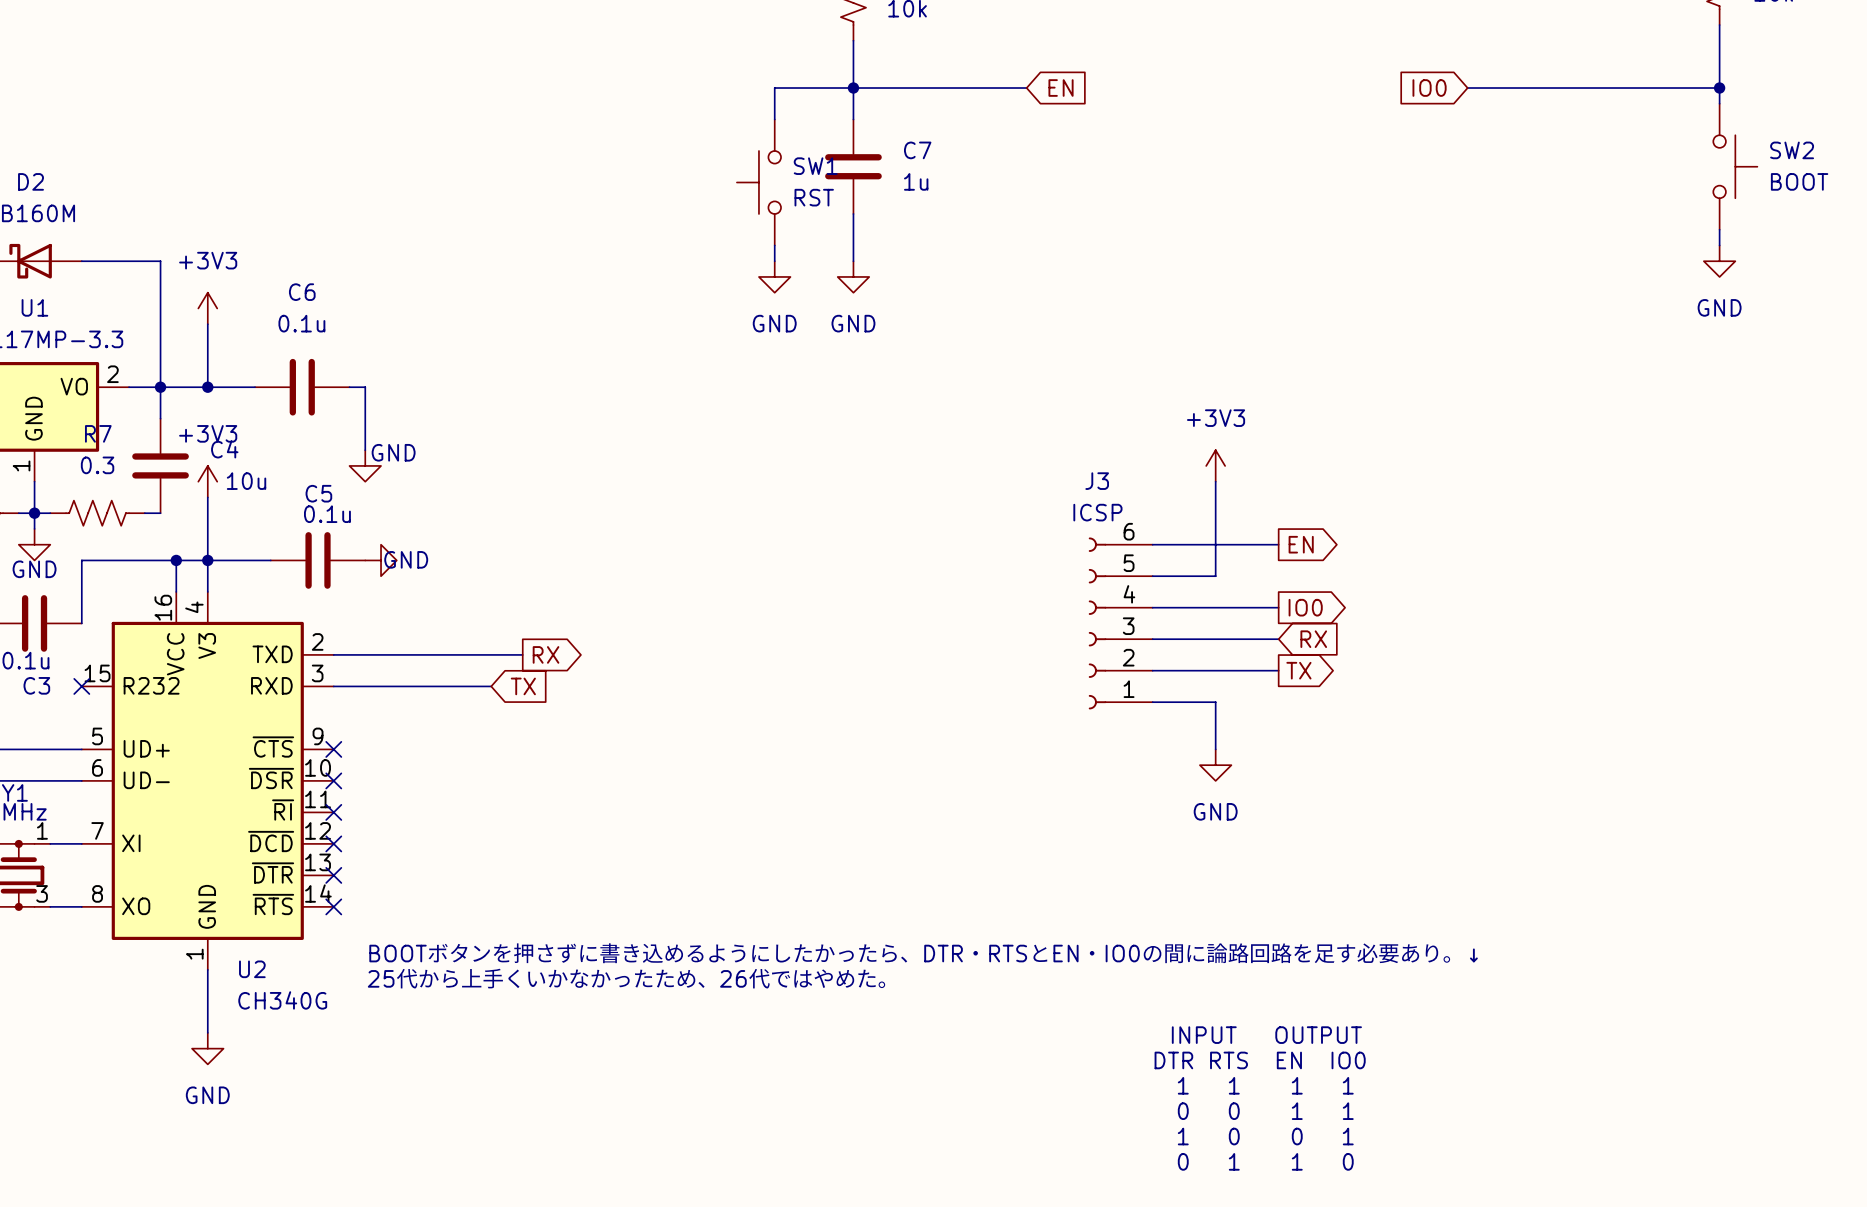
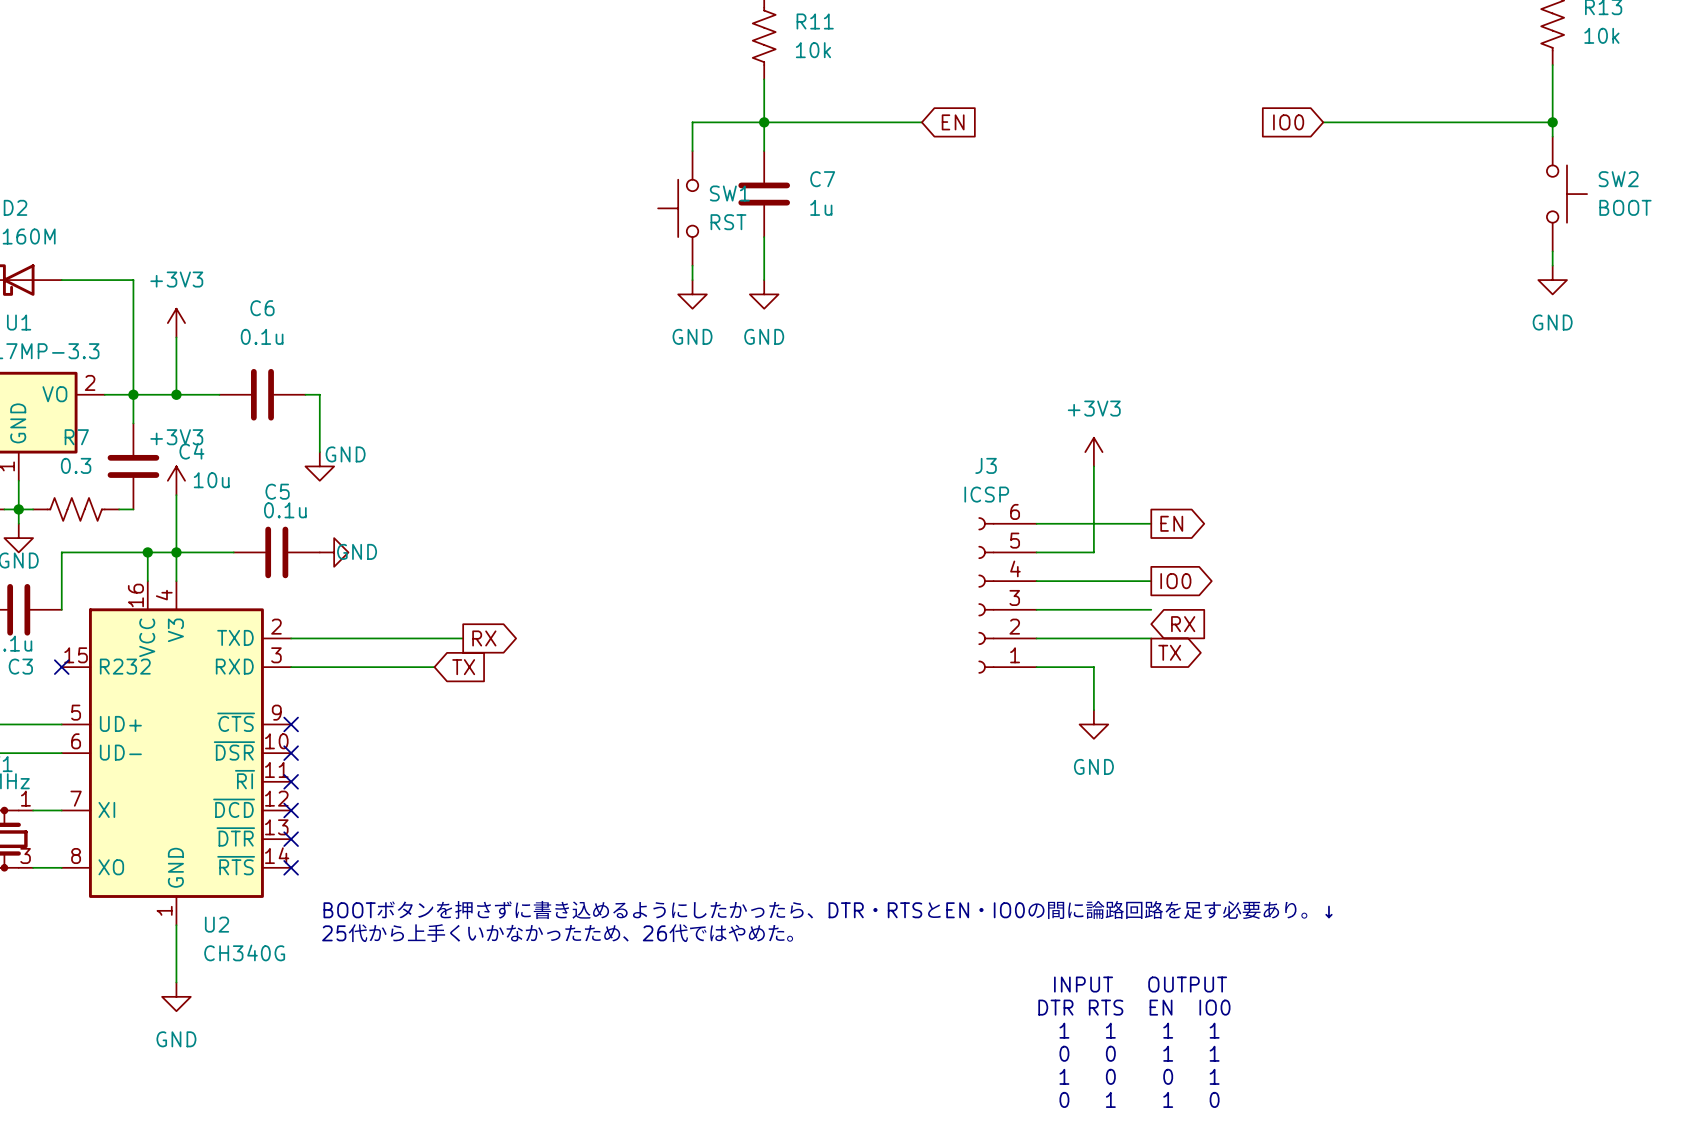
power symbol position: +3V3 (1215, 465) -> +3V3 (1093, 452)
wire: (1152, 544) (1278, 544) -> (1036, 523) (1151, 523)
global label position: EN (1301, 544) -> EN (1171, 523)
wire: (1215, 560) (1215, 576) (1152, 576) -> (1093, 552) (1036, 552)
wire: (1152, 607) (1278, 607) -> (1036, 581) (1151, 581)
global label position: IO0 (1305, 607) -> IO0 (1175, 581)
J3 position: (1120, 623) -> (1007, 595)
wire: (1152, 639) (1278, 639) -> (1036, 609) (1151, 609)
wire: (1152, 670) (1278, 670) -> (1036, 638) (1151, 638)
wire: (1152, 702) (1215, 702) -> (1036, 667) (1093, 667) (1093, 681)
power symbol position: GND (1215, 765) -> GND (1093, 724)

